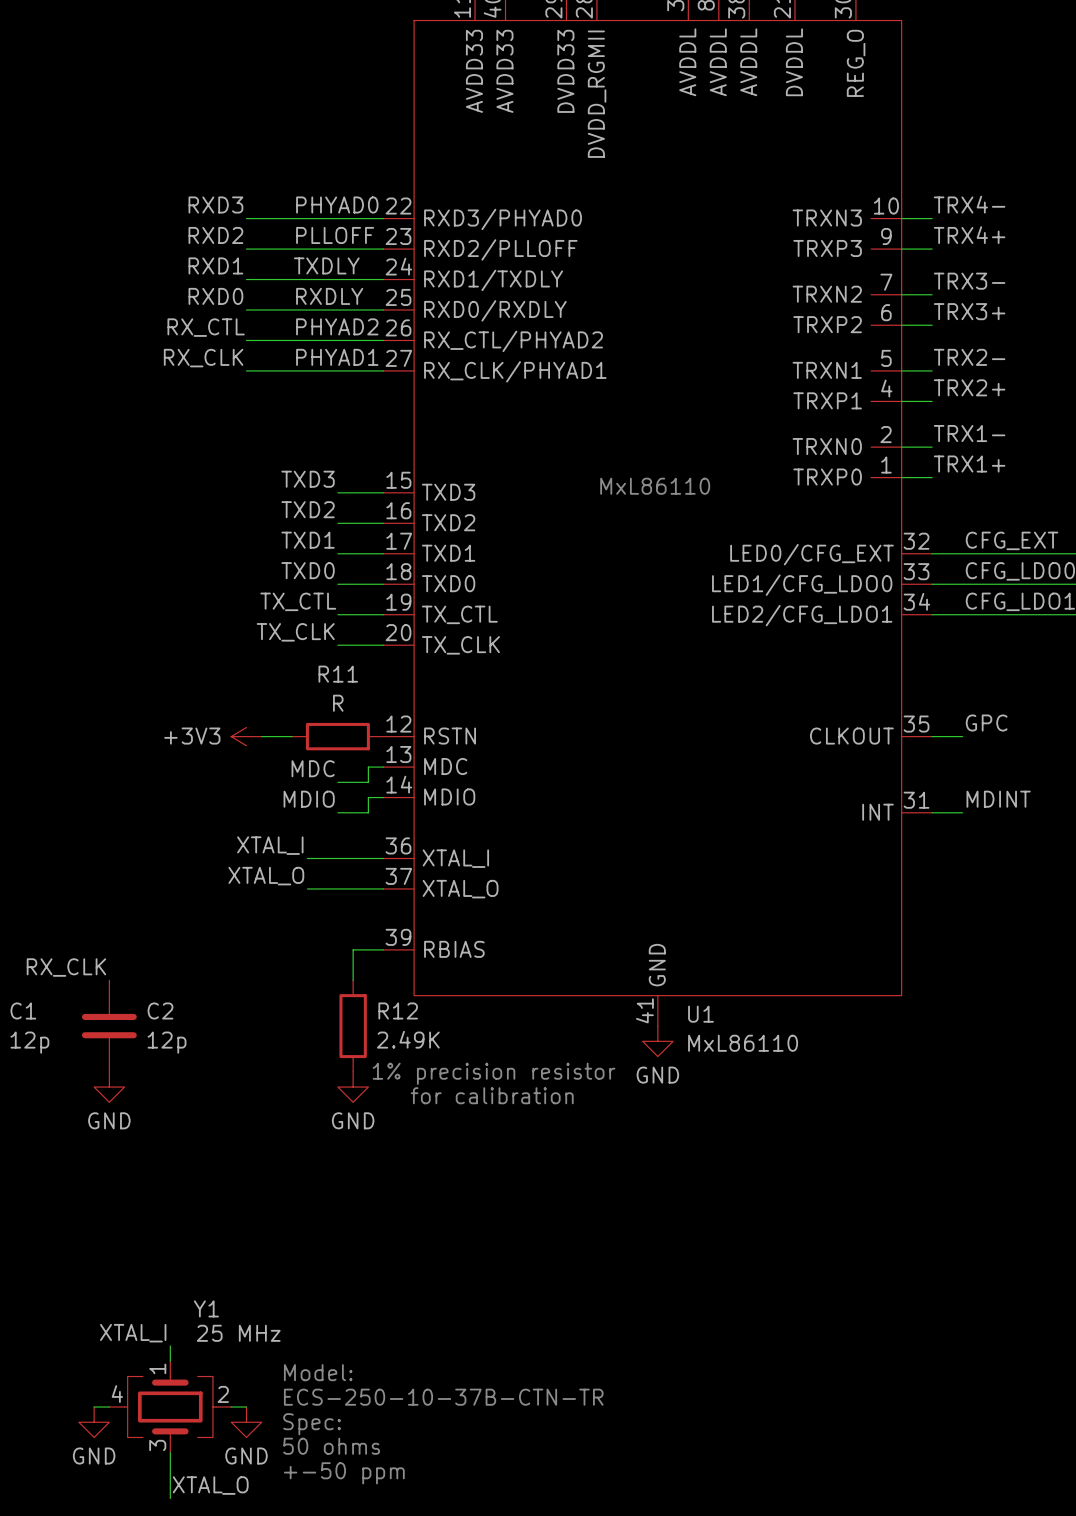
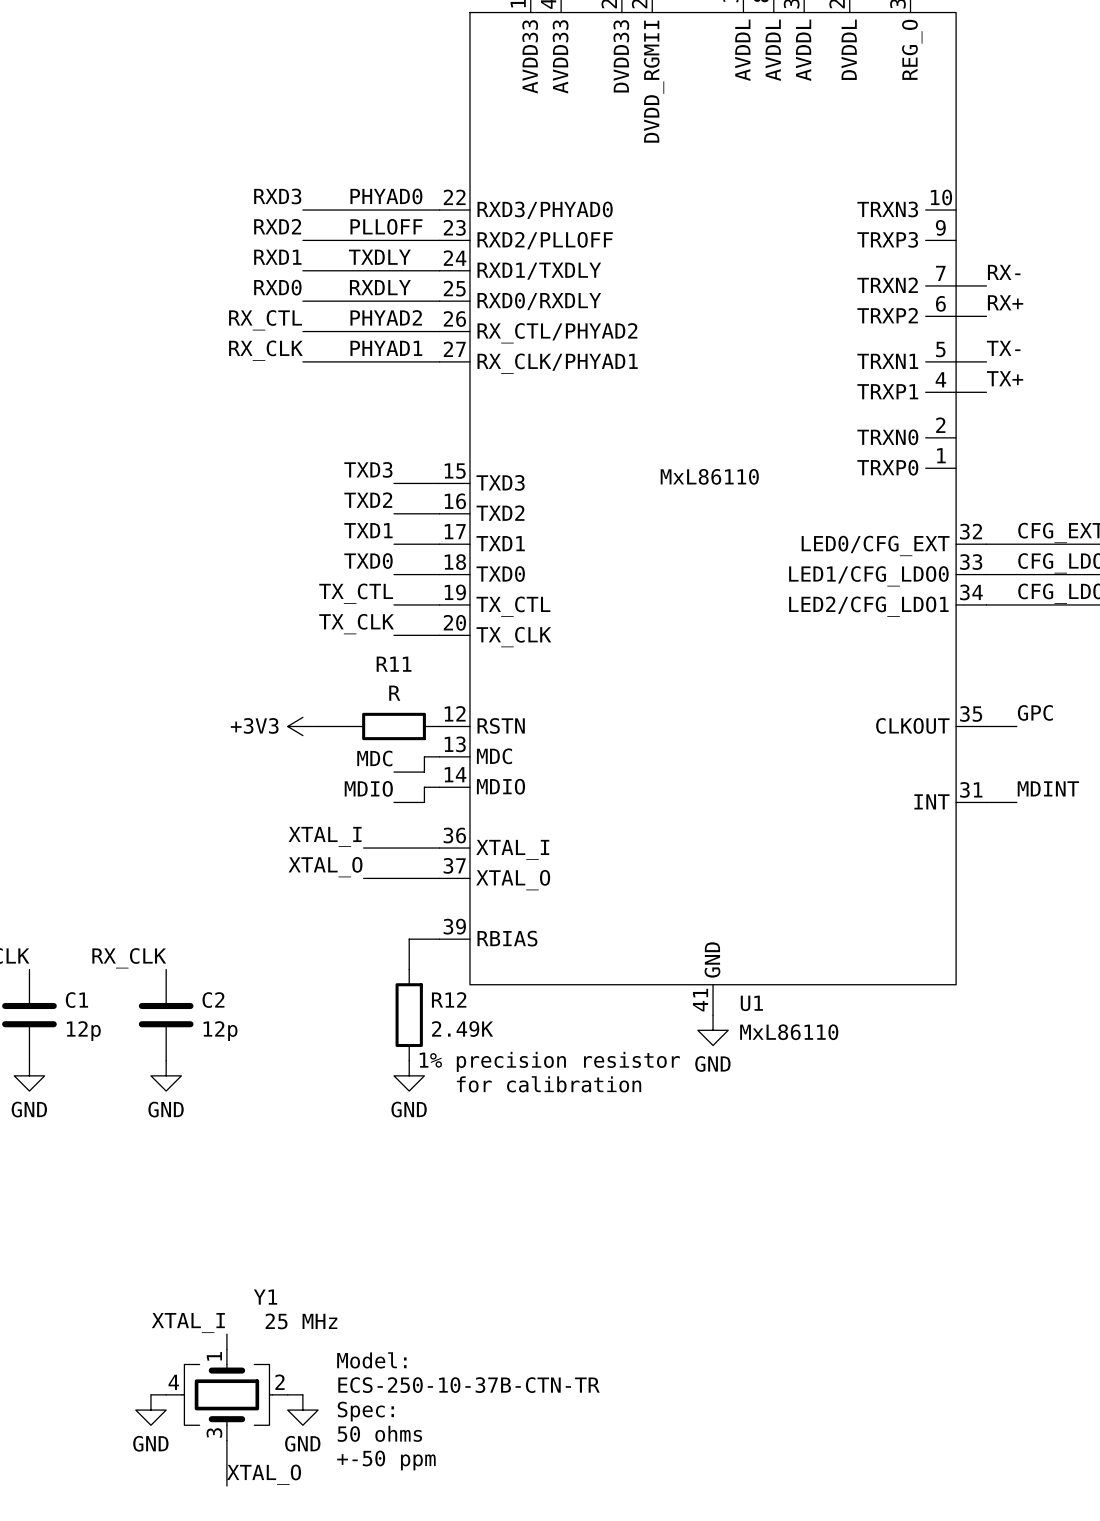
label: TRX4- (969, 204) -> none
wire: (901, 218) (932, 218) -> none
label: TRX4+ (969, 235) -> none
wire: (901, 249) (932, 249) -> none
label: TRX3- (969, 281) -> RX- (1004, 272)
label: TRX3+ (969, 311) -> RX+ (1005, 302)
label: TRX2- (969, 357) -> TX- (1003, 348)
label: TRX2+ (969, 387) -> TX+ (1005, 378)
label: TRX1- (969, 433) -> none
wire: (901, 447) (932, 447) -> none
label: TRX1+ (969, 464) -> none
wire: (901, 477) (932, 477) -> none

